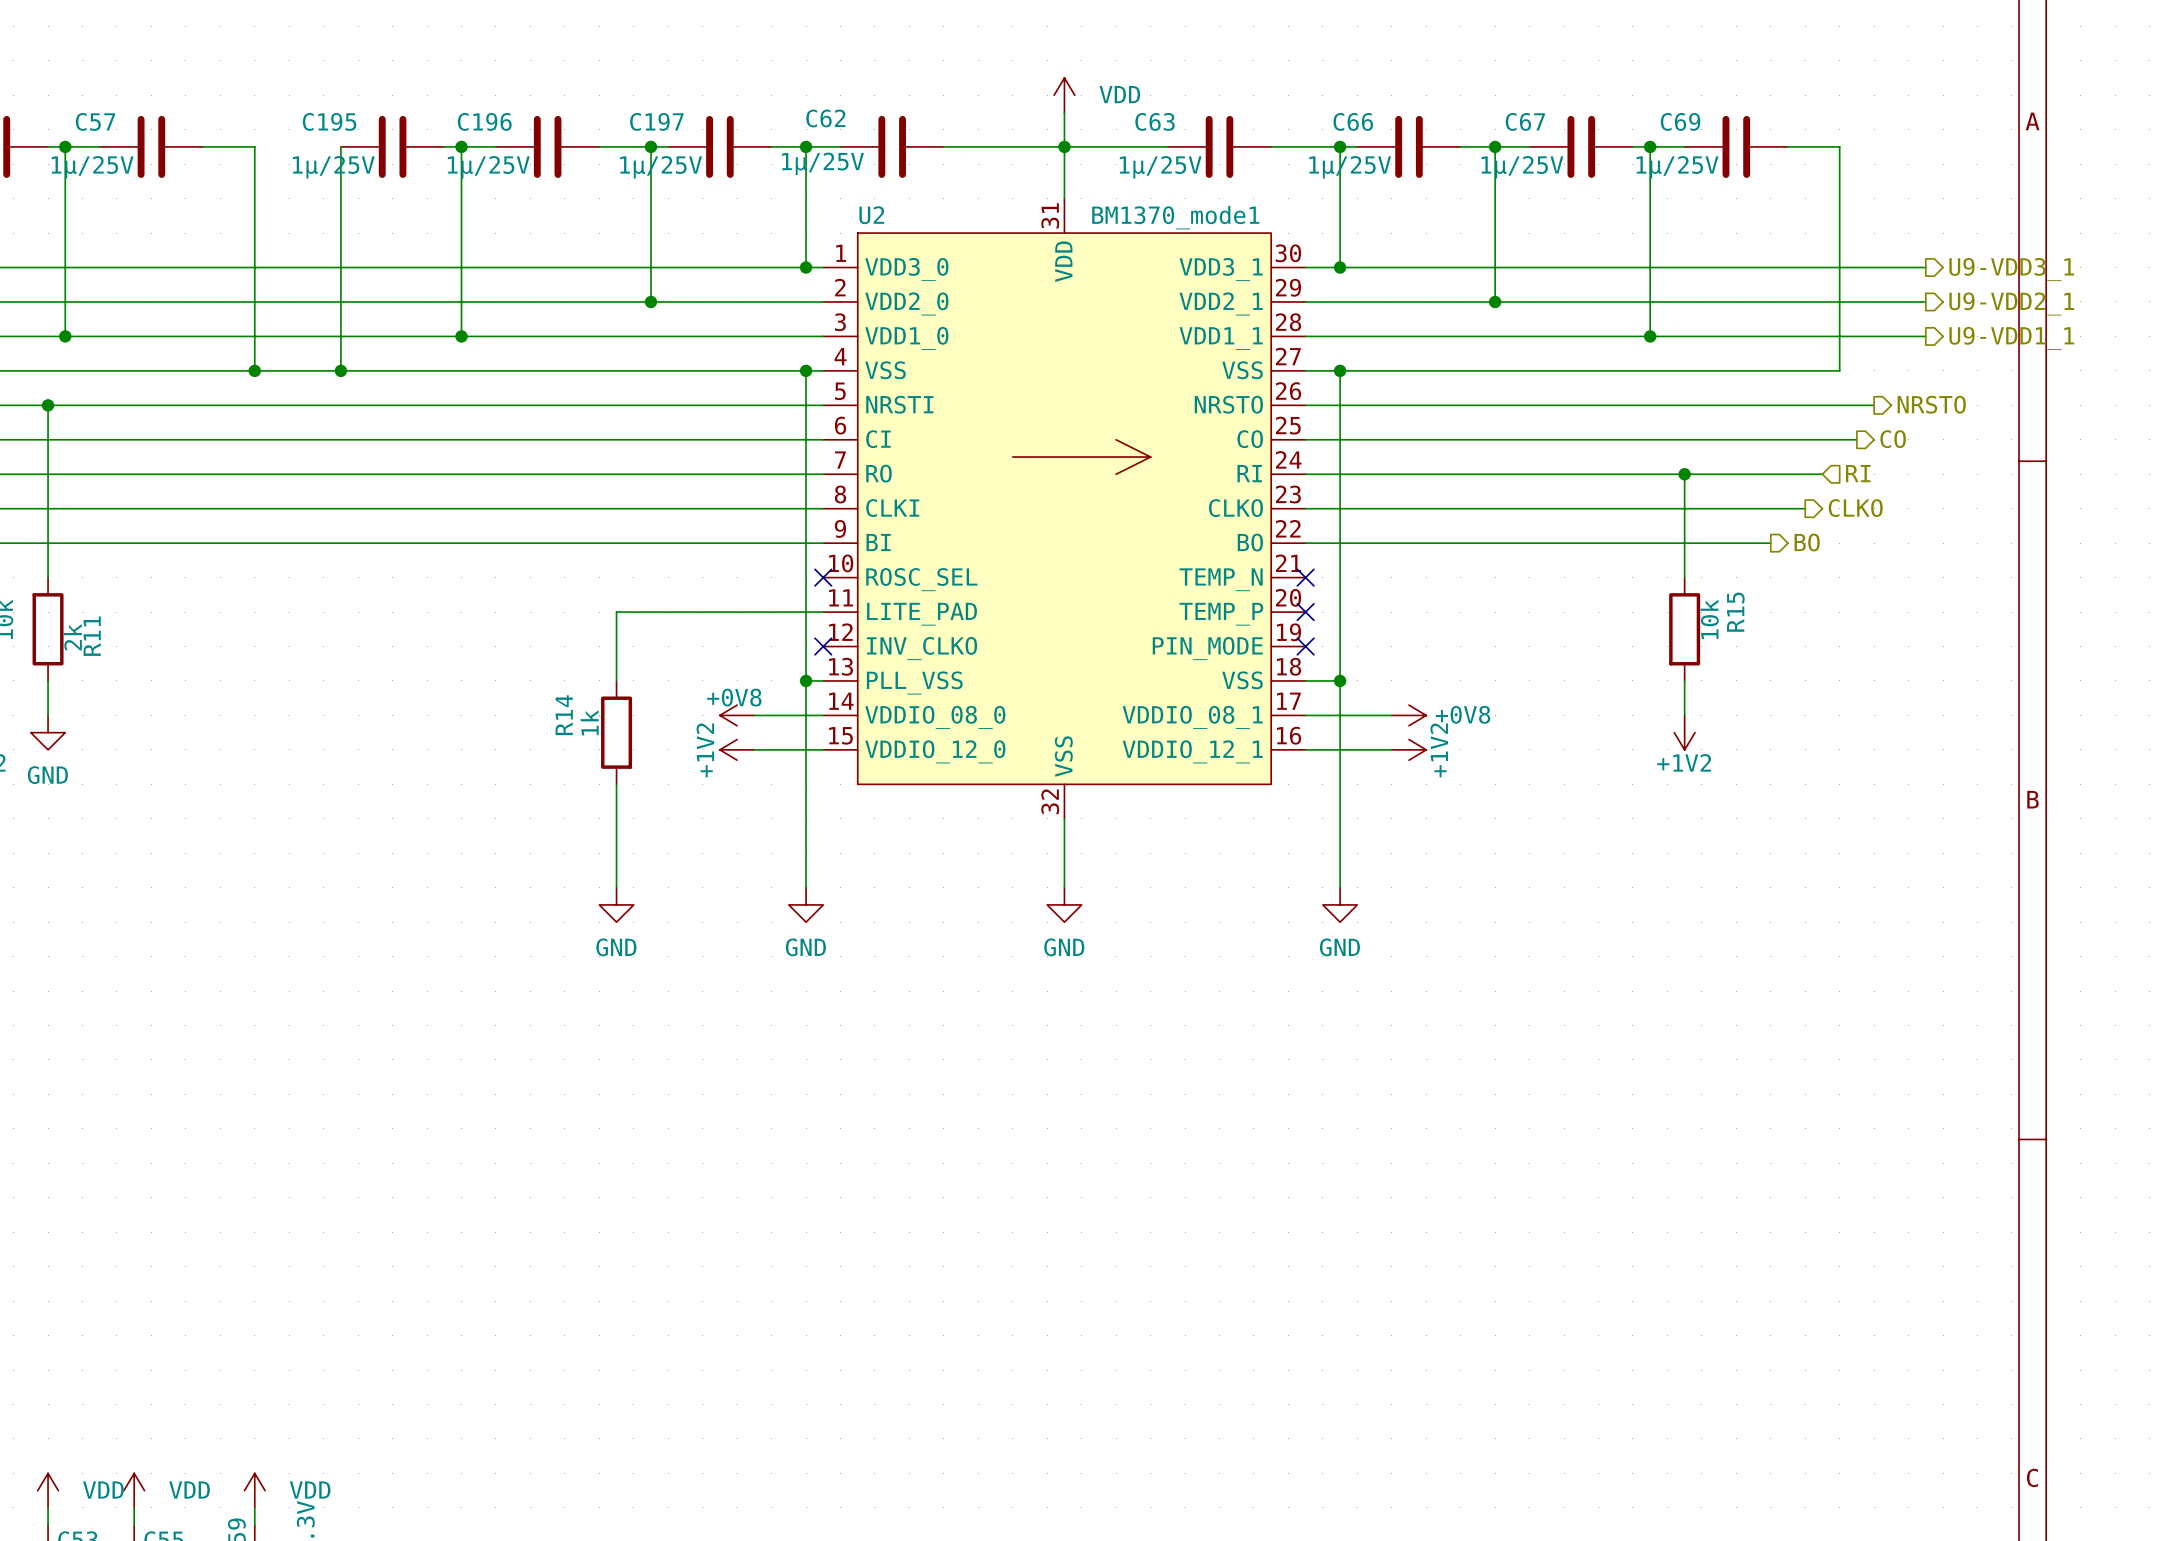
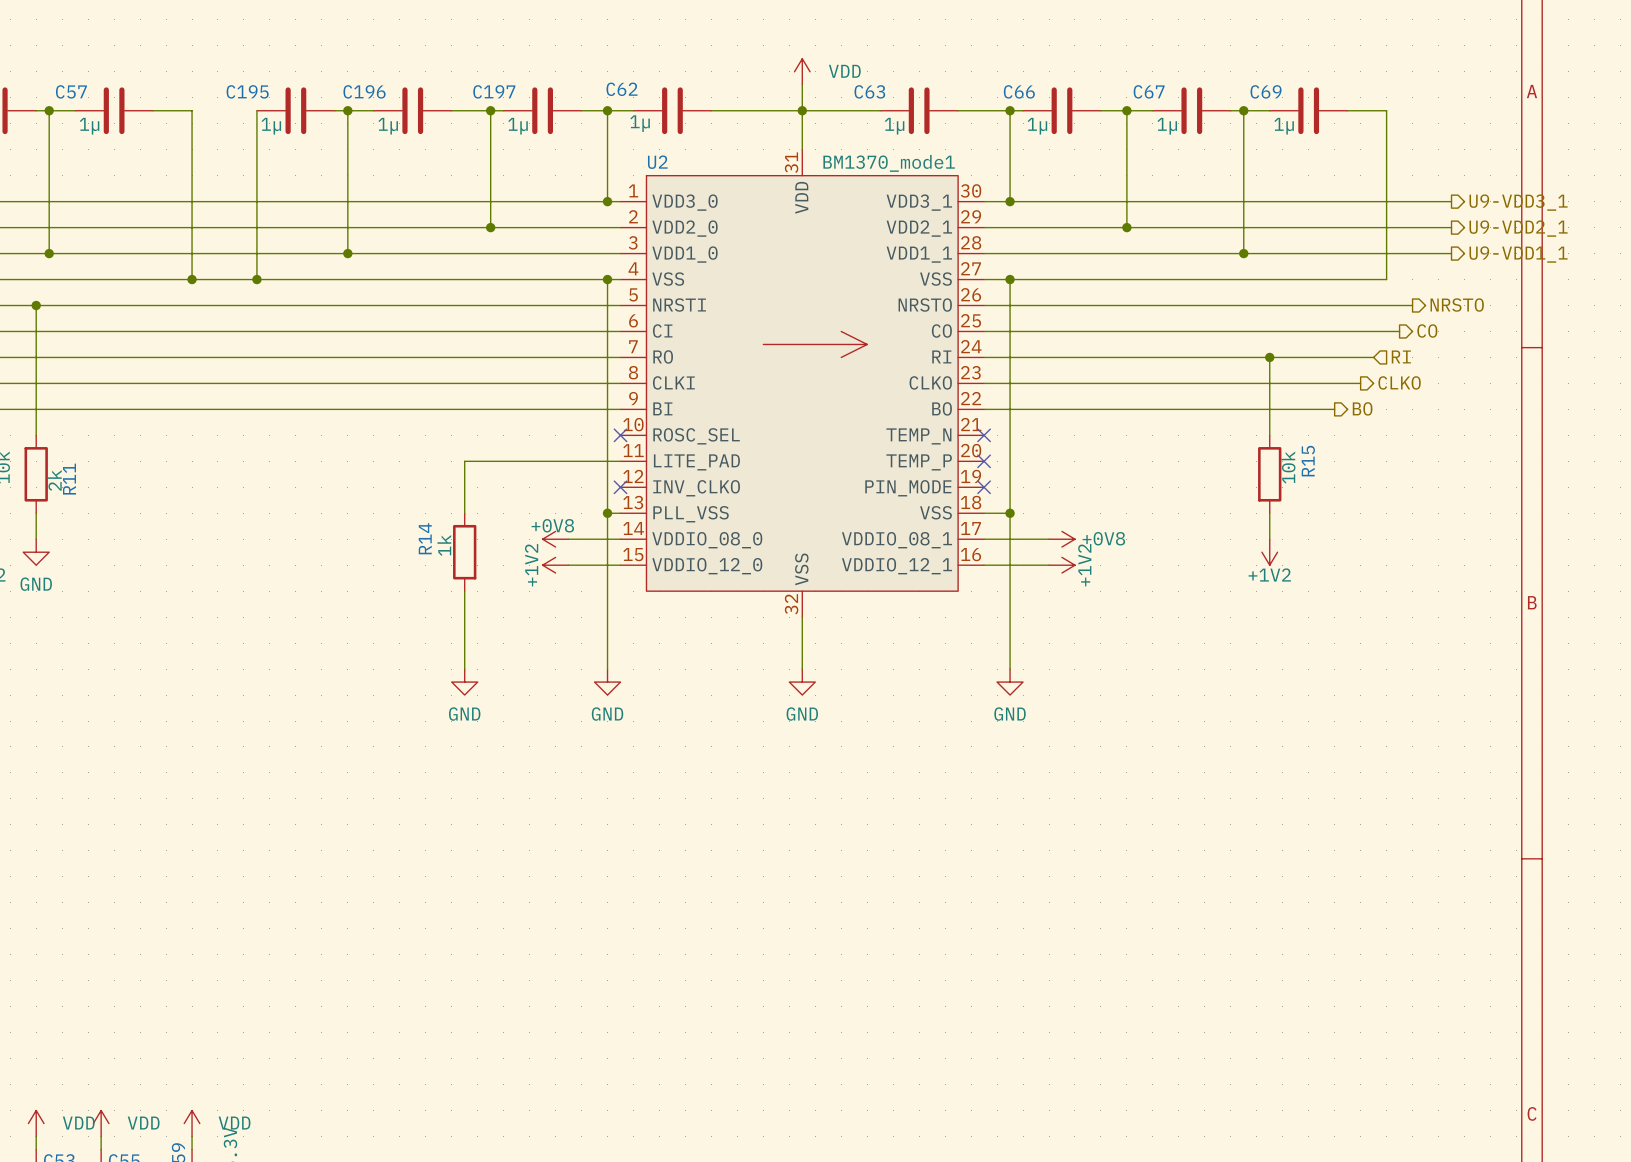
C62 value: 1µ/25V (823, 163) -> 1µ (640, 123)
C57 value: 1µ/25V (92, 167) -> 1µ (89, 126)
C195 value: 1µ/25V (333, 167) -> 1µ (271, 126)
C196 value: 1µ/25V (488, 167) -> 1µ (388, 126)
C197 value: 1µ/25V (661, 167) -> 1µ (518, 126)
C63 value: 1µ/25V (1160, 167) -> 1µ (894, 126)
C66 value: 1µ/25V (1350, 167) -> 1µ (1037, 126)
C67 value: 1µ/25V (1522, 167) -> 1µ (1167, 126)
C69 value: 1µ/25V (1677, 167) -> 1µ (1284, 126)

